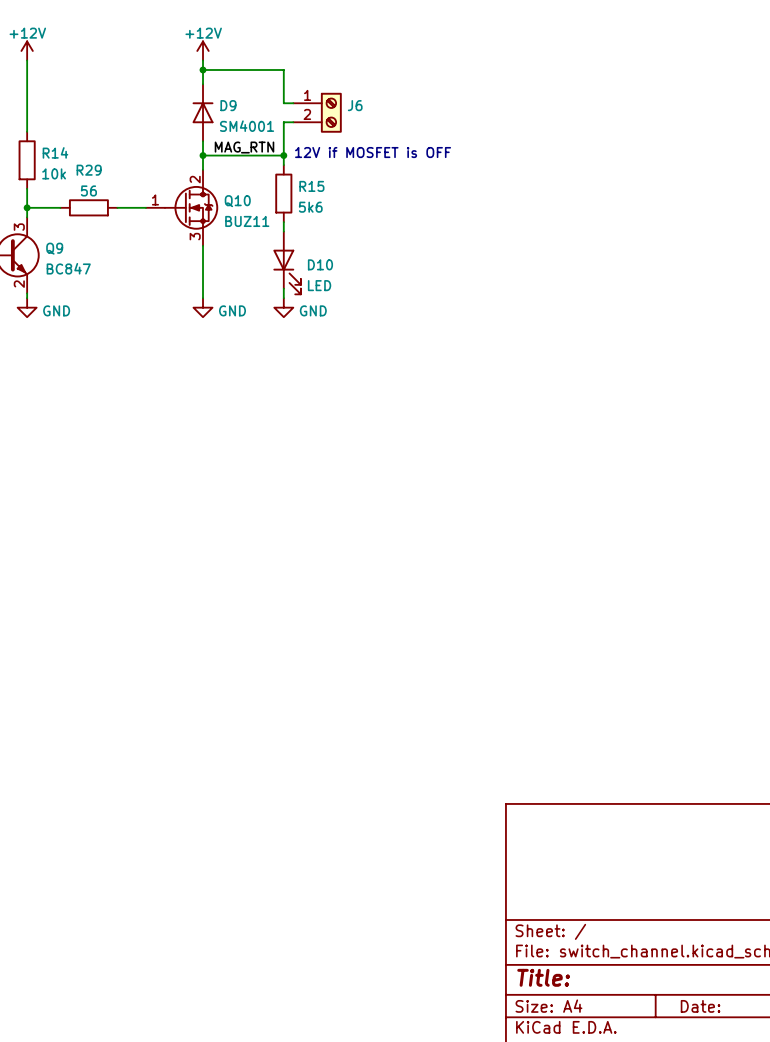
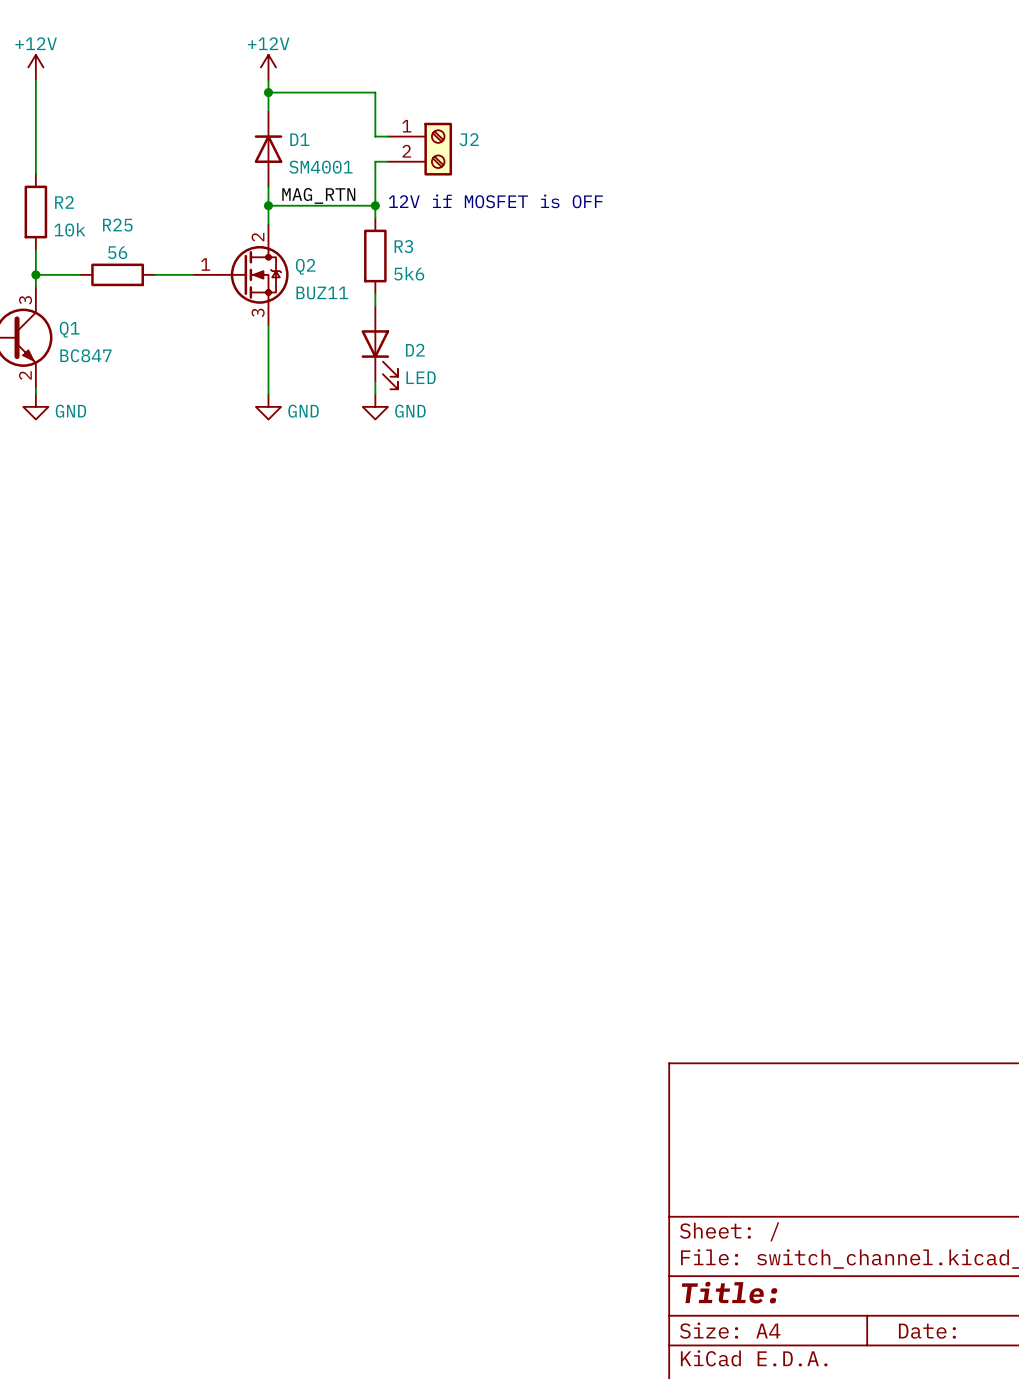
D9 name: D9 (228, 105) -> D1 (299, 139)
J6 name: J6 (355, 105) -> J2 (469, 139)
R14 name: R14 (55, 152) -> R2 (64, 202)
R29 name: R29 (89, 170) -> R25 (117, 225)
R15 name: R15 (311, 186) -> R3 (403, 246)
Q10 name: Q10 (237, 201) -> Q2 (305, 266)
Q9 name: Q9 (54, 248) -> Q1 (69, 329)
D10 name: D10 (320, 264) -> D2 (415, 350)

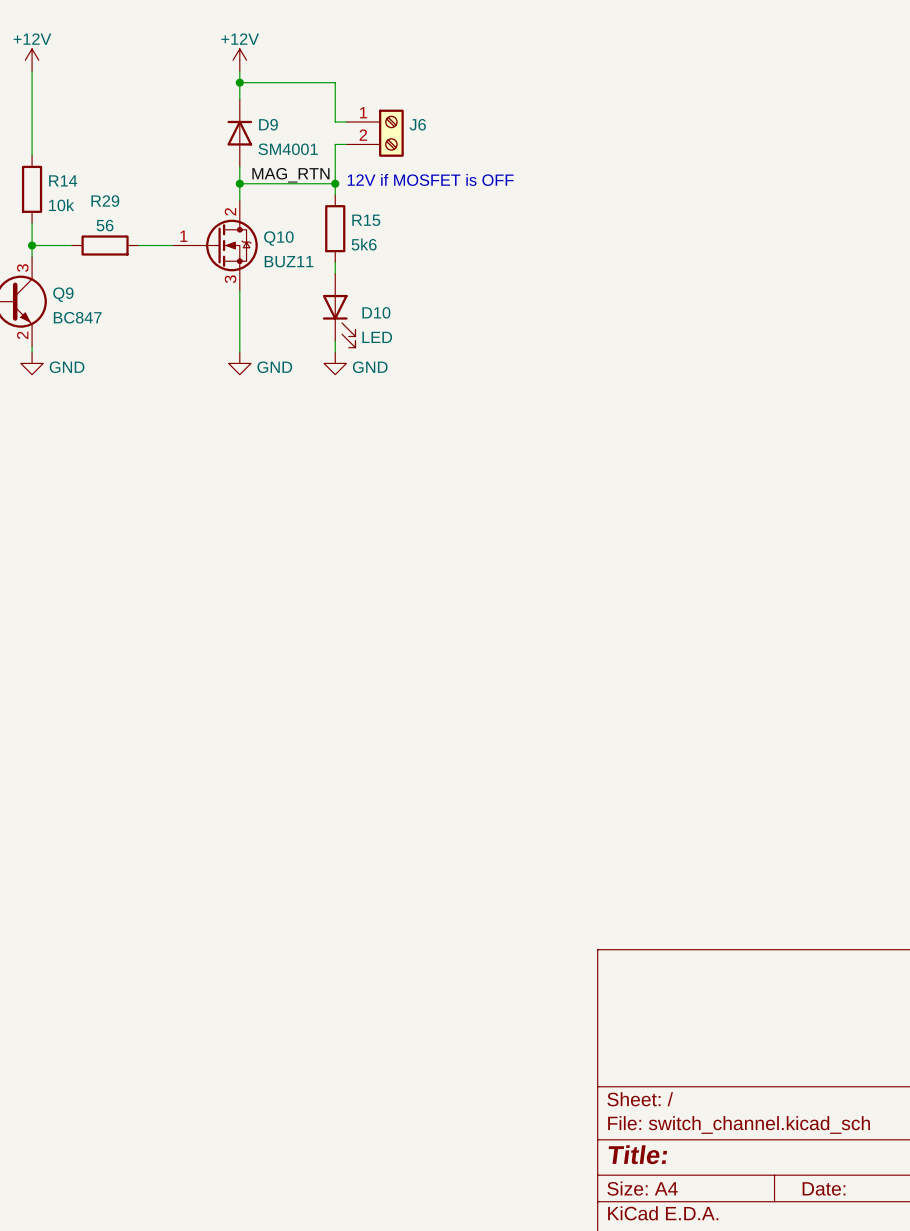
D1 name: D1 (299, 139) -> D9 (268, 124)
J2 name: J2 (469, 139) -> J6 (417, 124)
R2 name: R2 (64, 202) -> R14 (63, 180)
R25 name: R25 (117, 225) -> R29 (105, 201)
R3 name: R3 (403, 246) -> R15 (366, 220)
Q2 name: Q2 (305, 266) -> Q10 (278, 238)
Q1 name: Q1 (69, 329) -> Q9 (63, 294)
D2 name: D2 (415, 350) -> D10 (376, 312)

